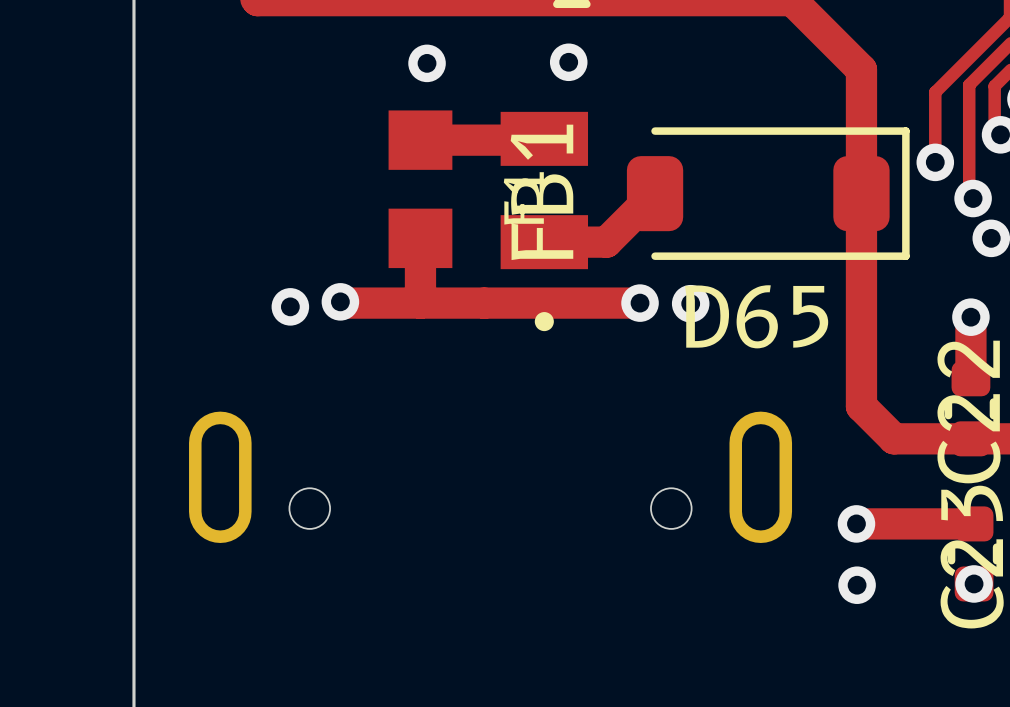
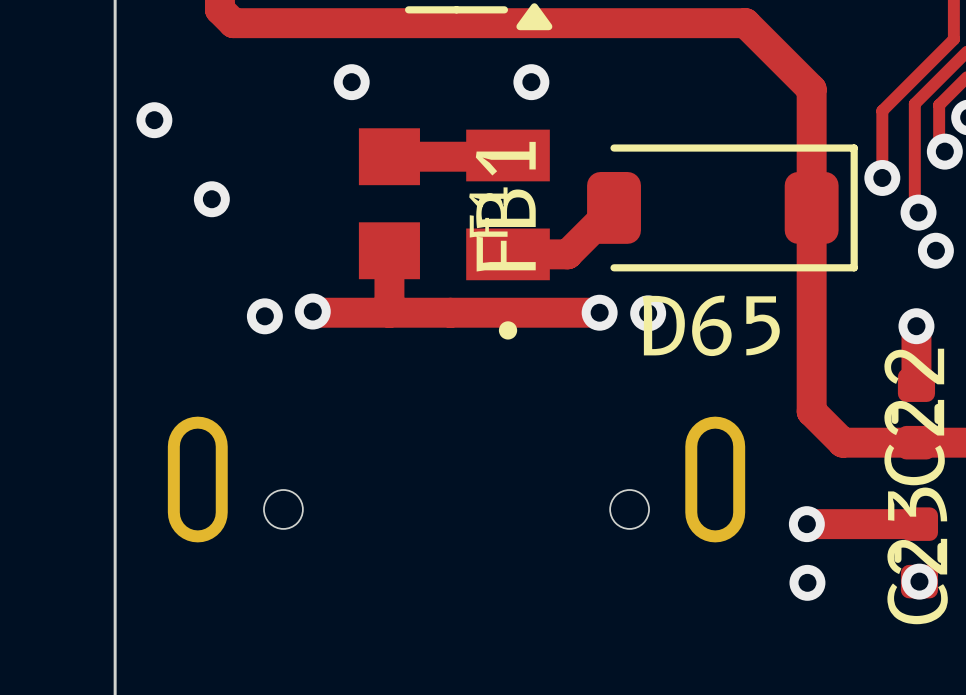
via position: (427, 63) -> (351, 82)
via: none -> (154, 120)
via: none -> (211, 199)

